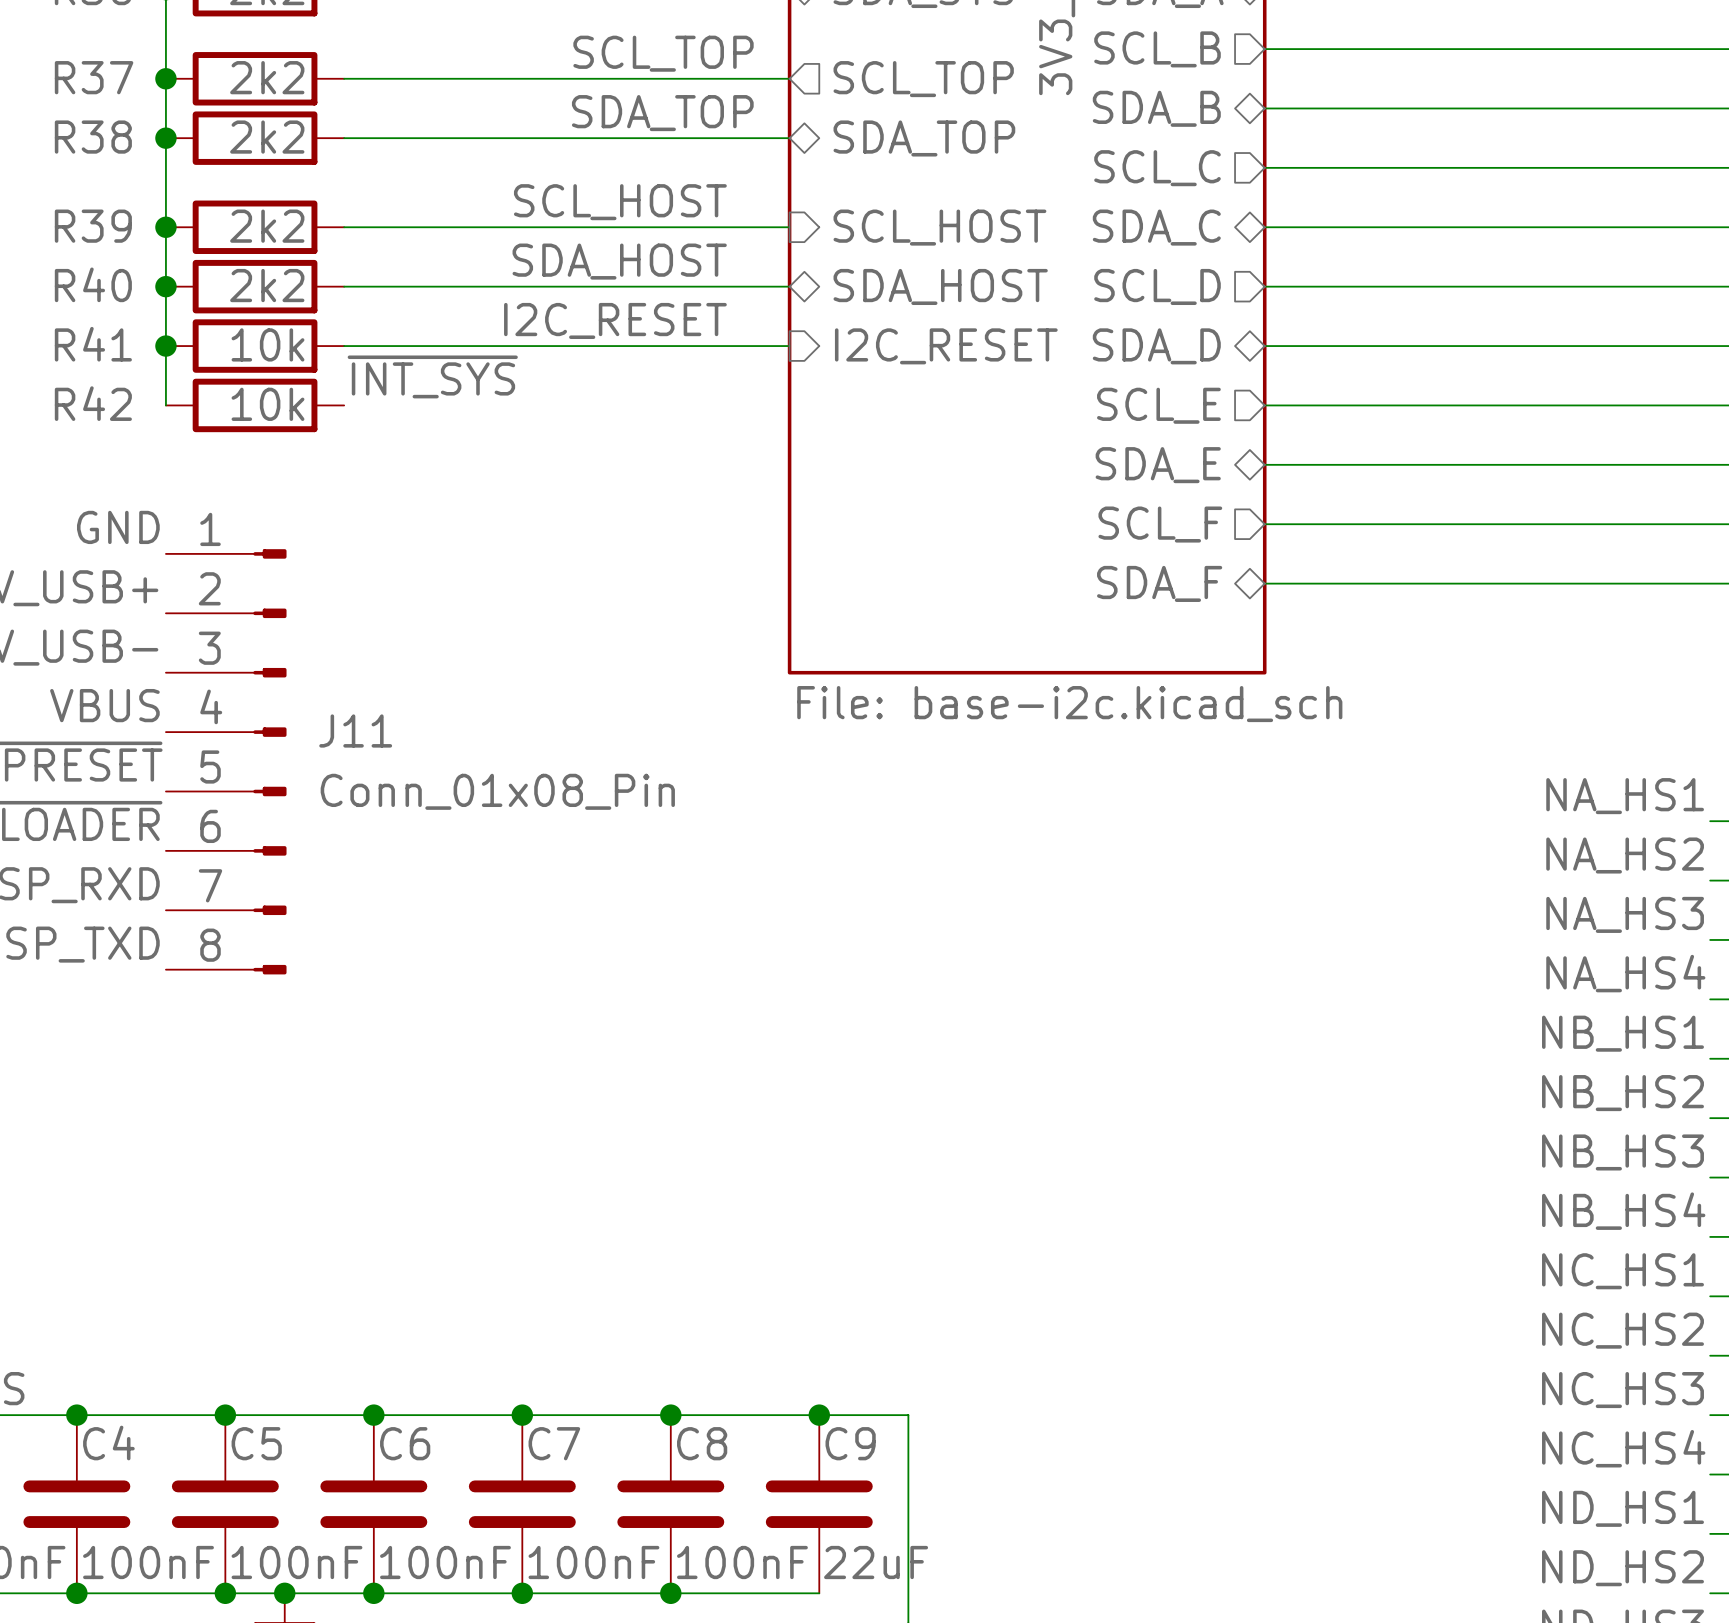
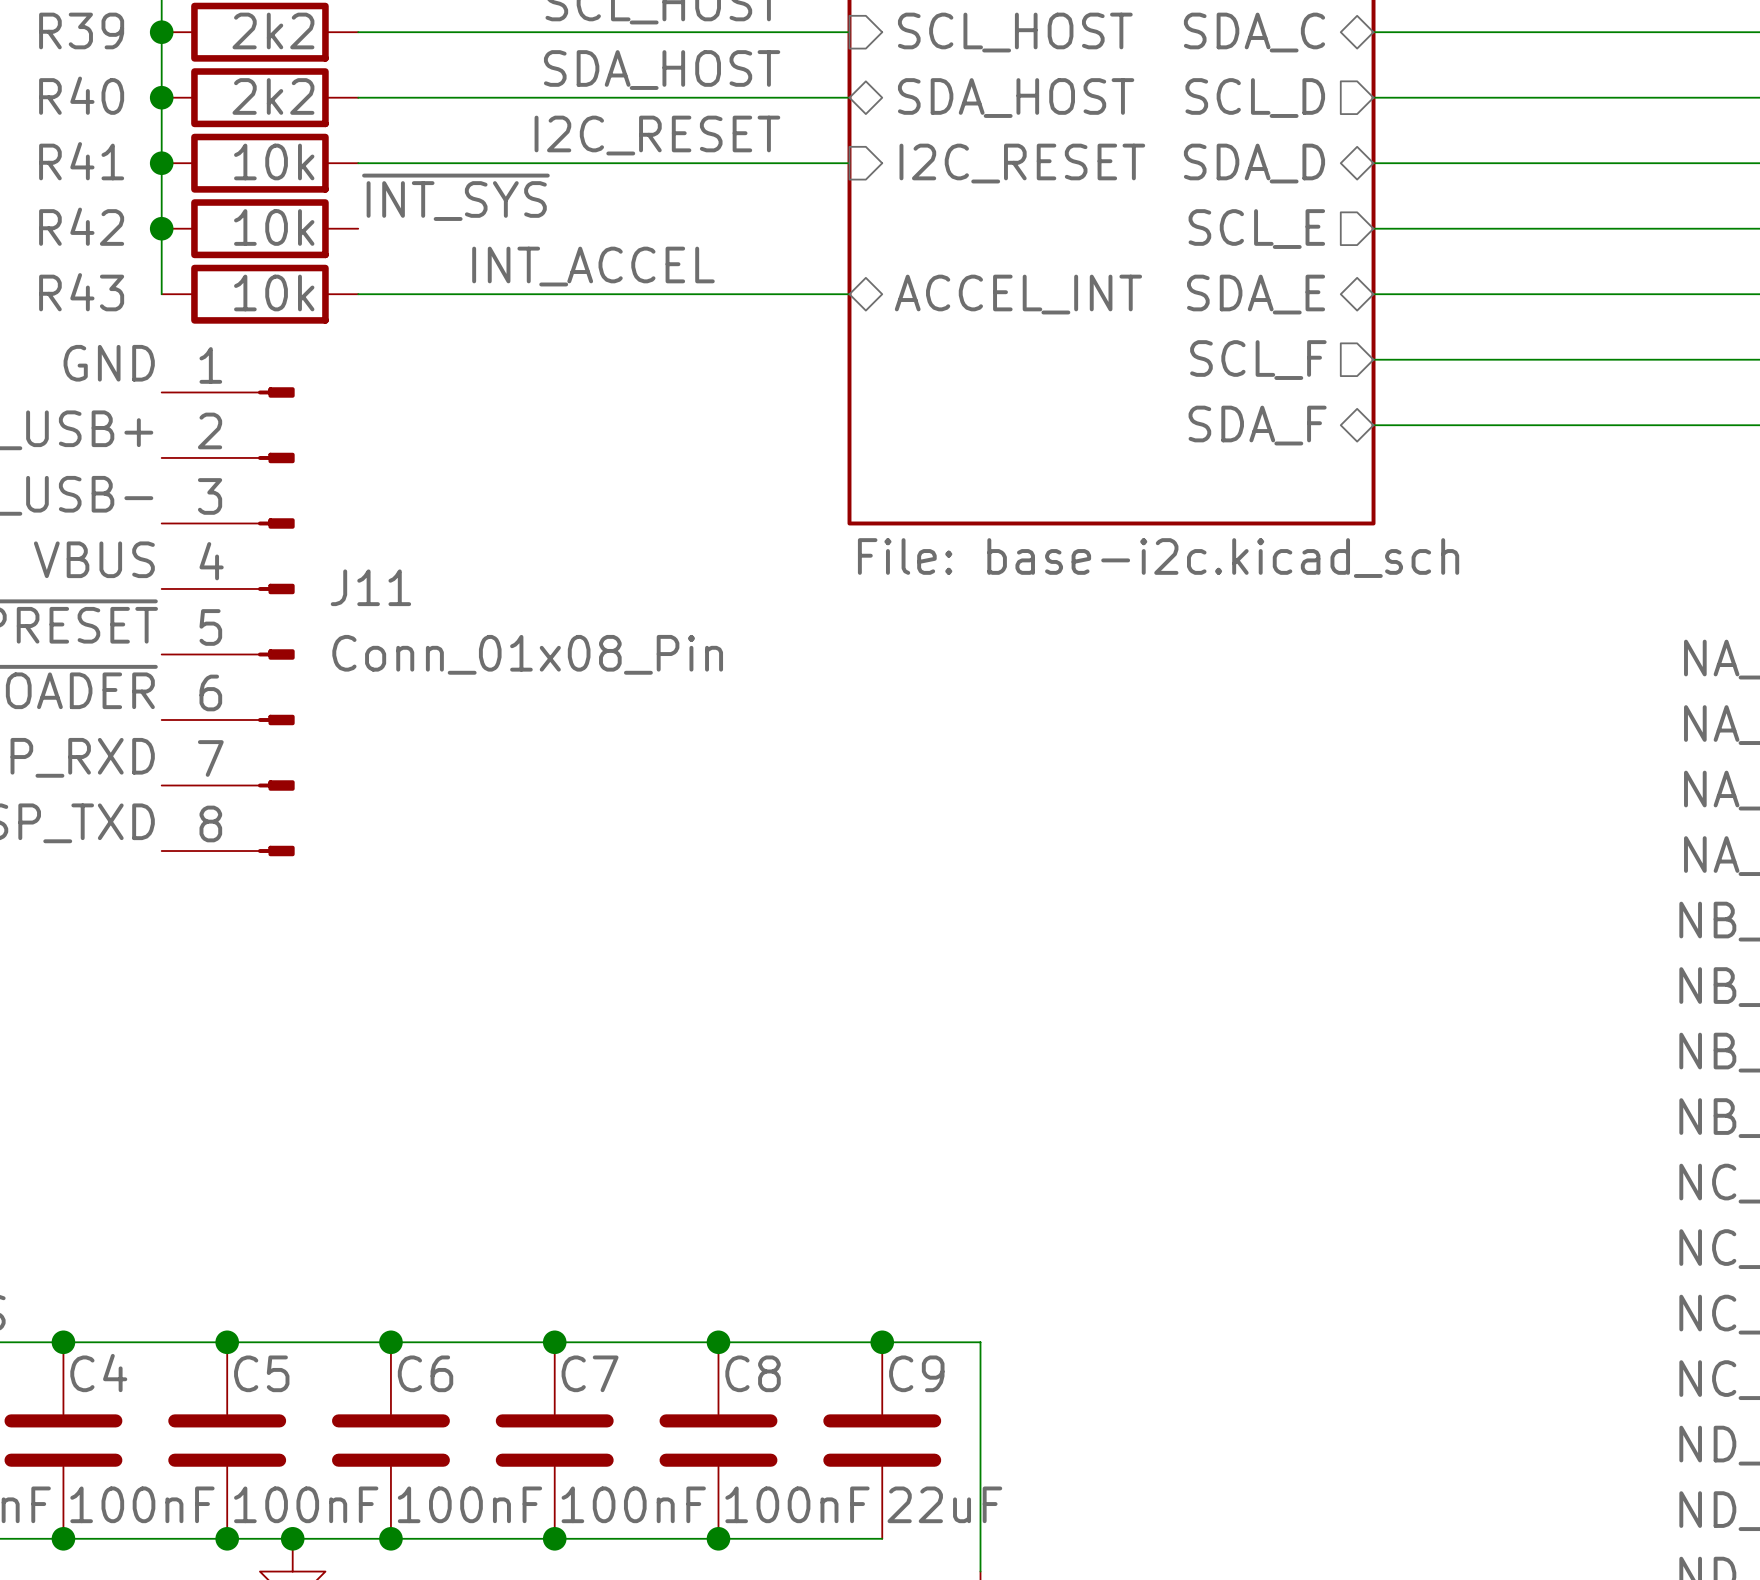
wire: none -> (161, 228) (161, 294)
junction: none -> (161, 228)
label: none -> INT_ACCEL (593, 266)
R43: none -> 10k (259, 294)
wire: none -> (358, 294) (849, 294)
sheet pin: none -> ACCEL_INT (1018, 294)

